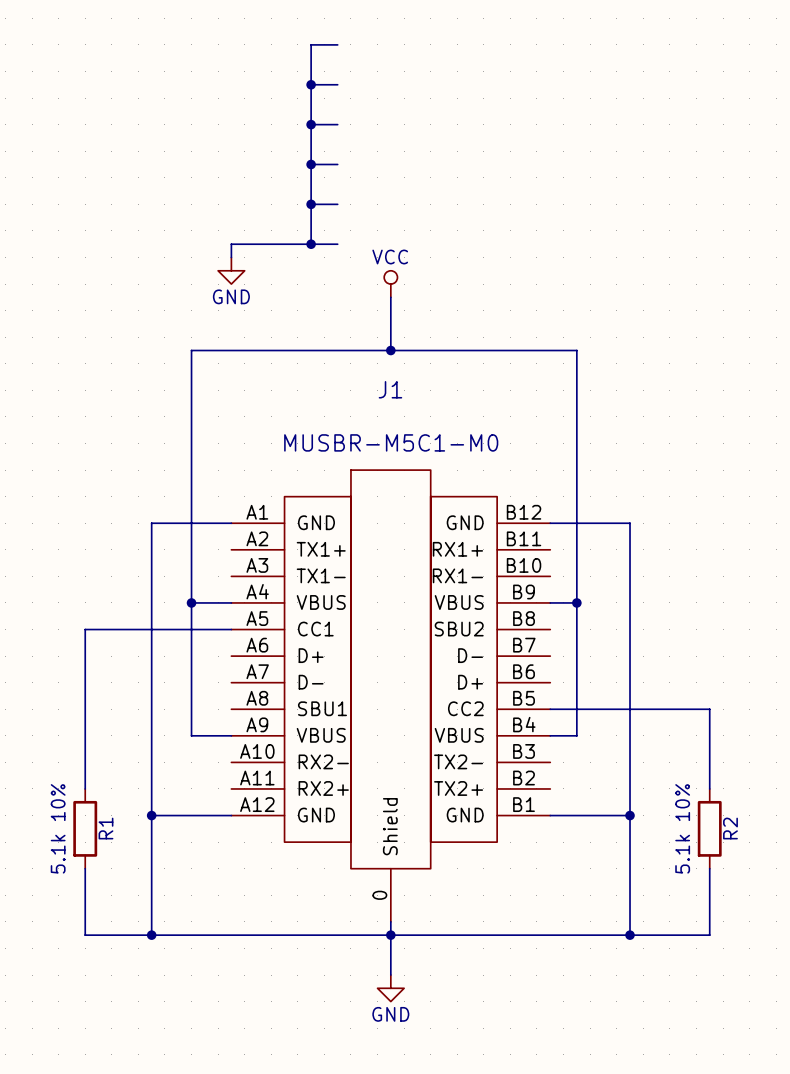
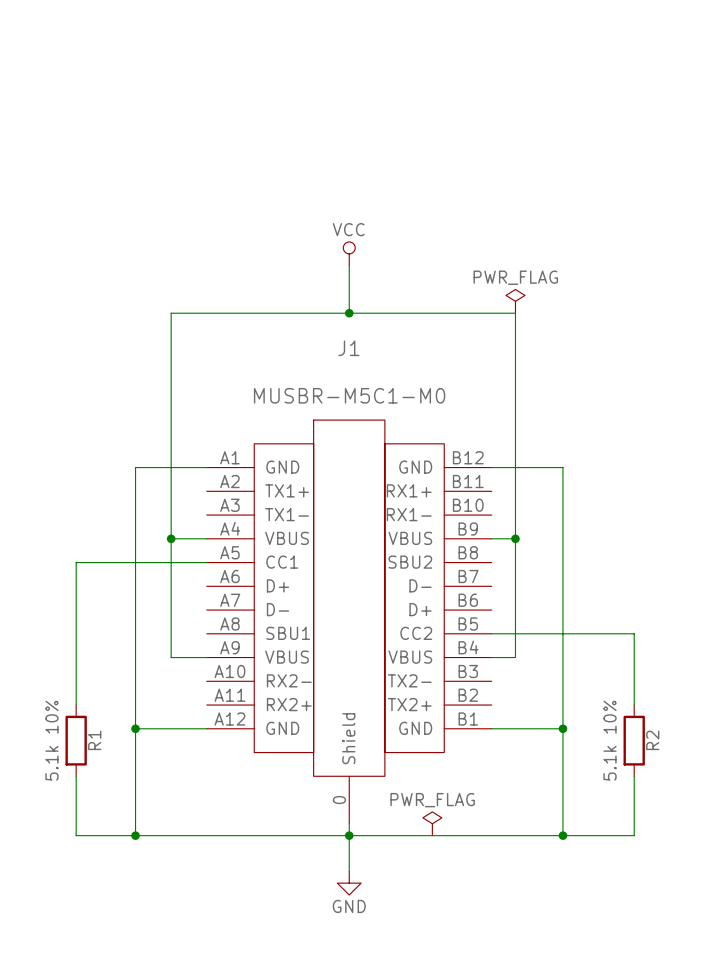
wire: (337, 44) (311, 44) (311, 244) -> none
wire: (311, 84) (337, 84) -> none
junction: (311, 84) -> none
wire: (311, 124) (337, 124) -> none
junction: (311, 124) -> none
wire: (311, 164) (337, 164) -> none
junction: (311, 164) -> none
wire: (311, 204) (337, 204) -> none
junction: (311, 204) -> none
junction: (311, 244) -> none
wire: (337, 244) (231, 244) (231, 257) -> none
power symbol: GND (231, 270) -> none
power symbol: none -> PWR_FLAG (515, 301)
power symbol: none -> PWR_FLAG (432, 823)

